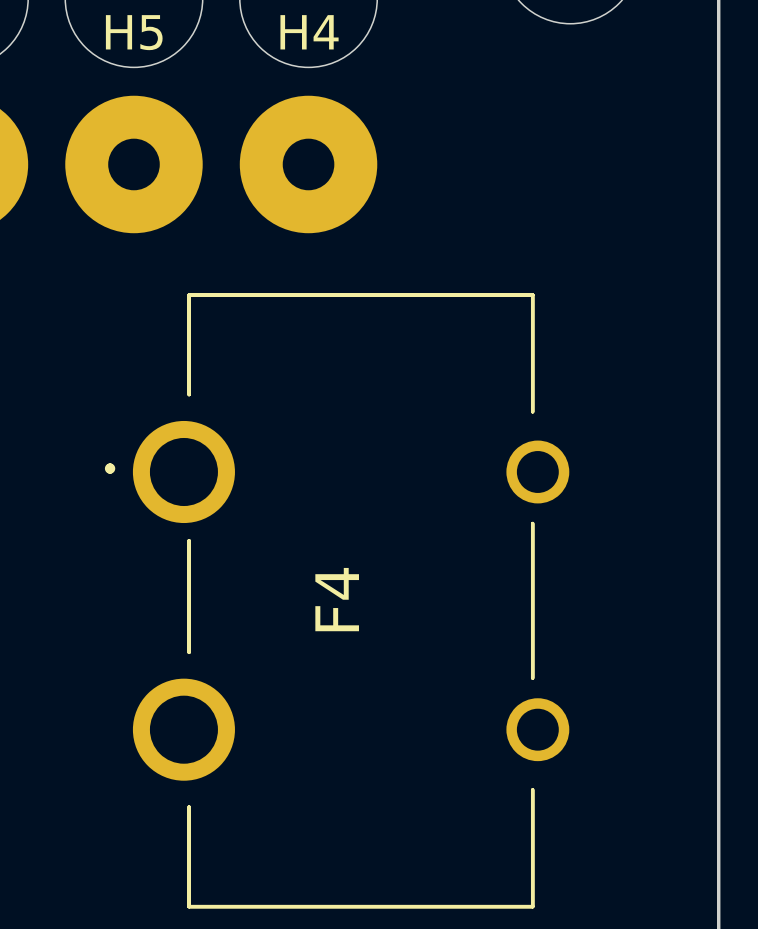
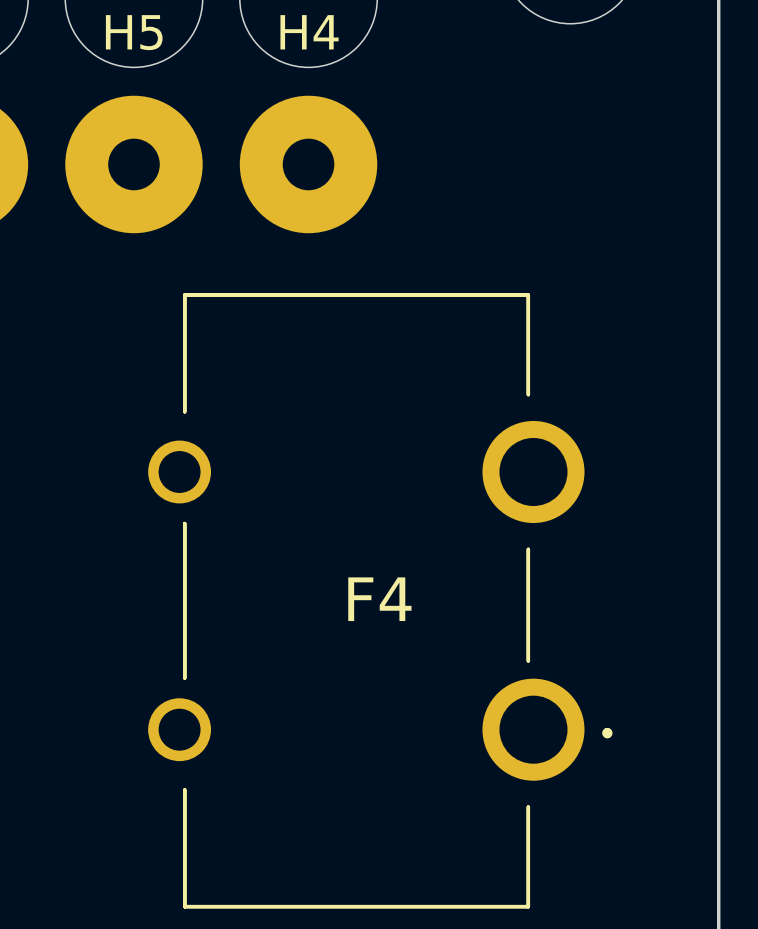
F4 rotation: 0° (337, 600) -> 180° (380, 600)

